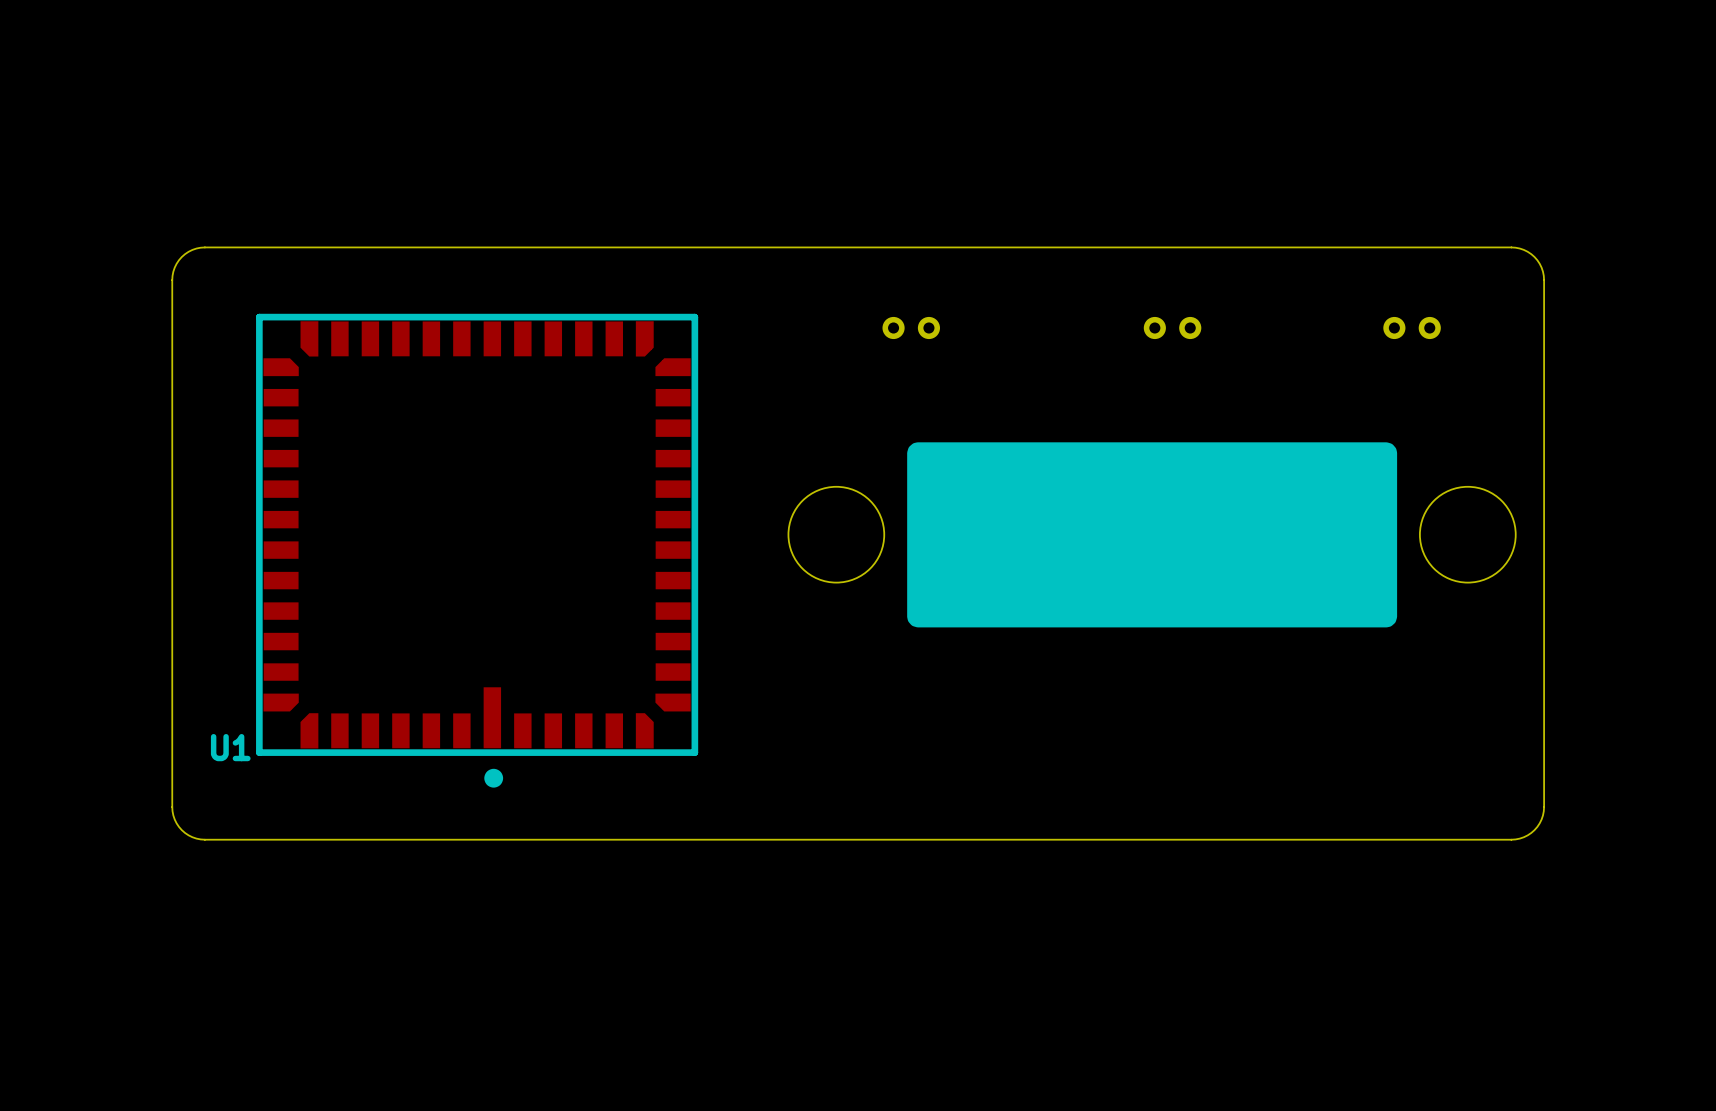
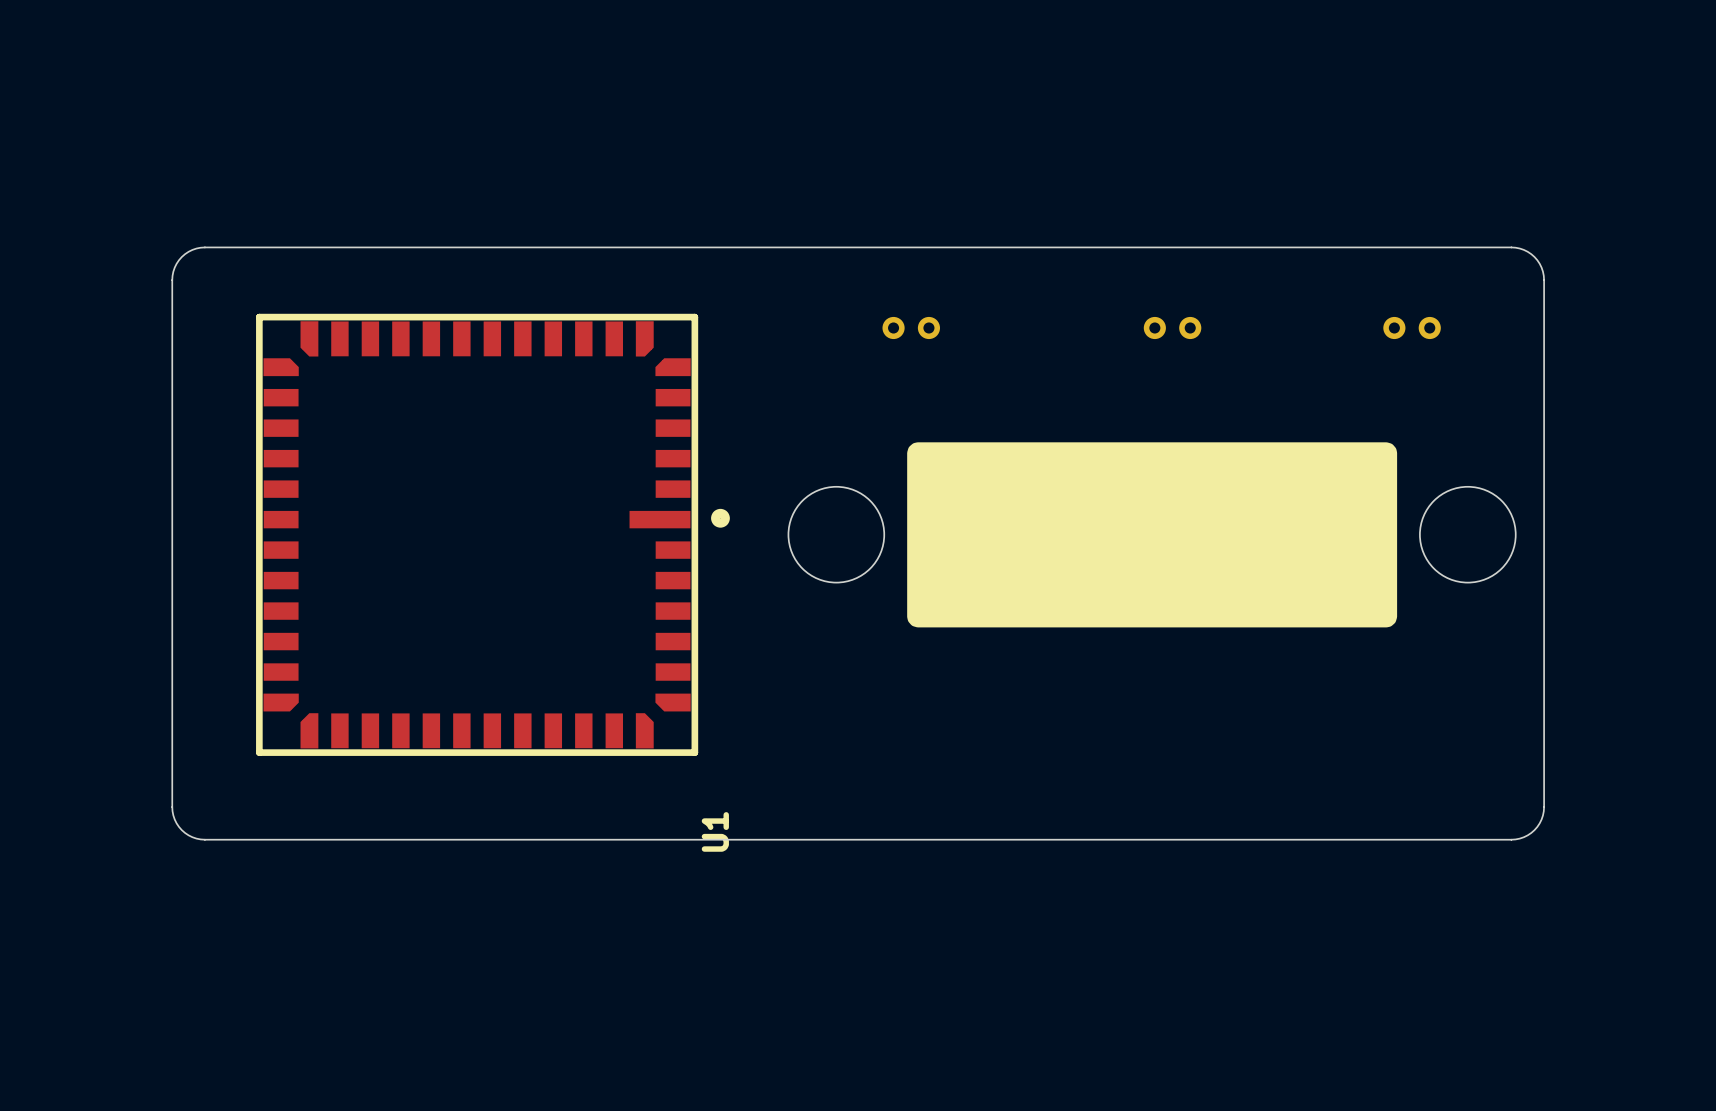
U1 rotation: 0° (477, 550) -> 90° counterclockwise (492, 534)

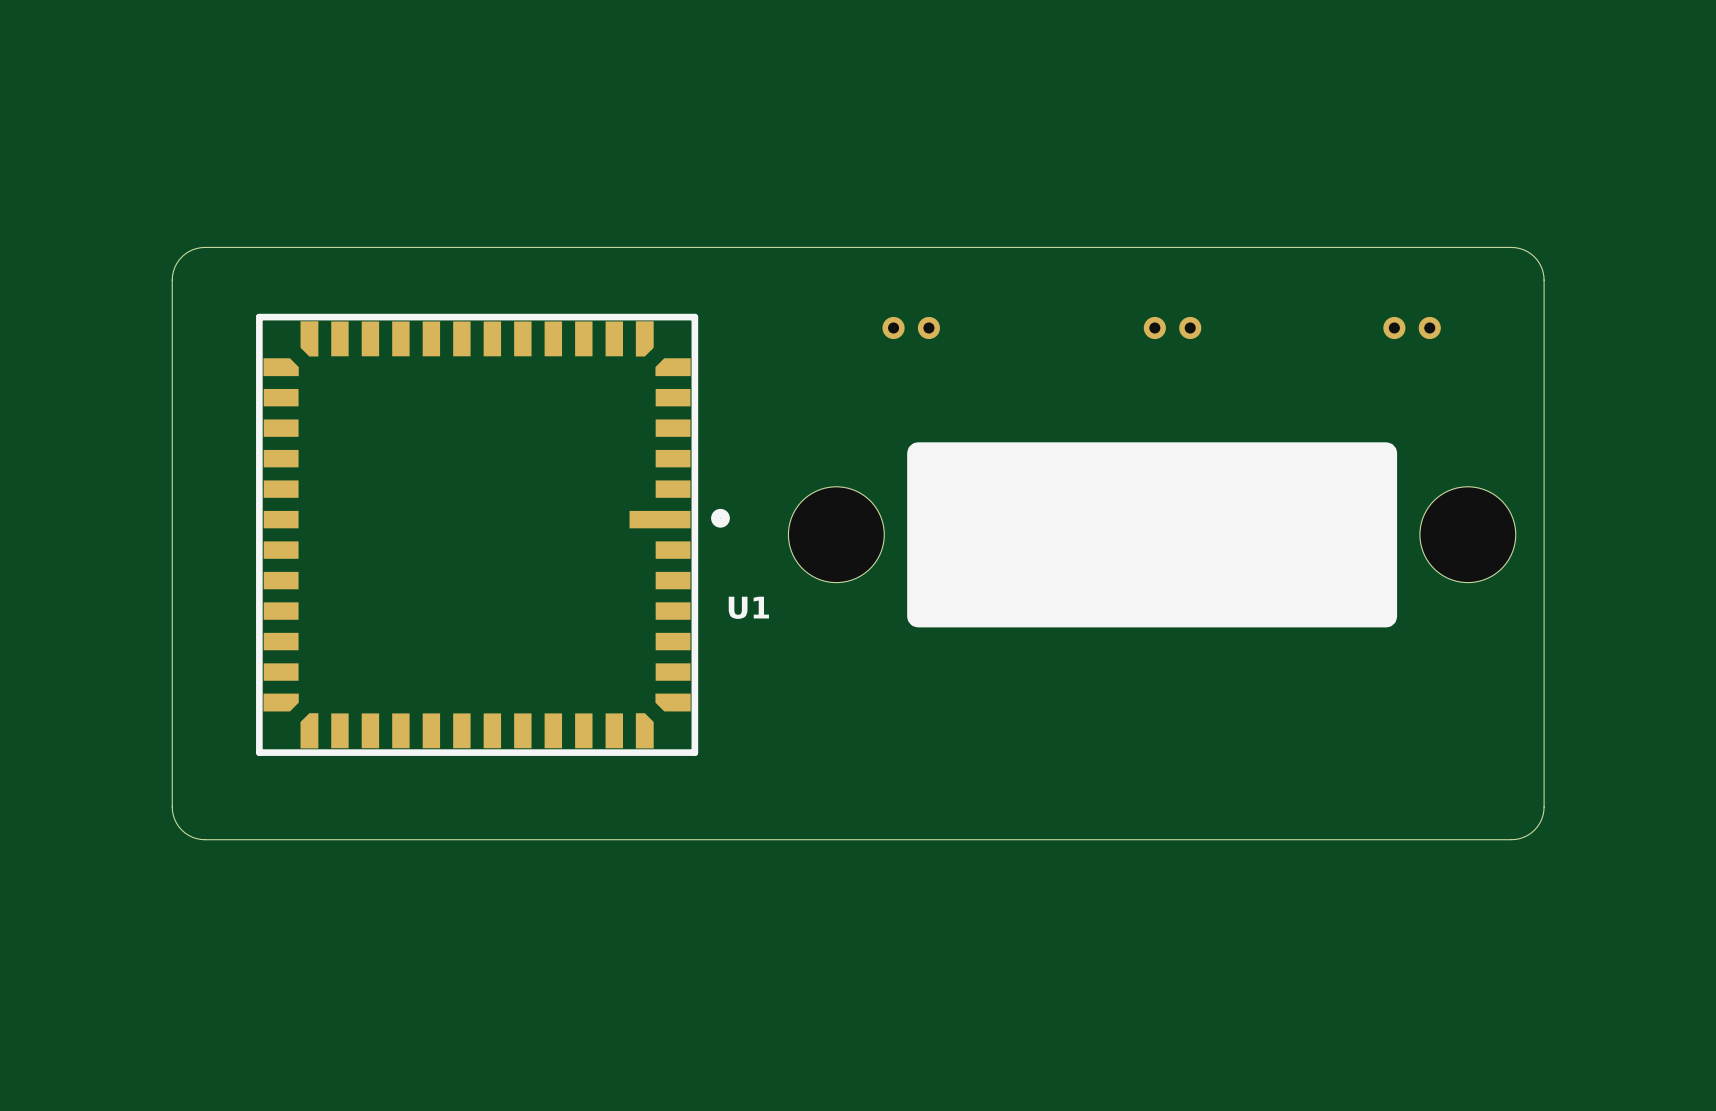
U1 name rotation: 0° (715, 831) -> 90° clockwise (748, 607)
U1 name position: U1 (715, 831) -> U1 (748, 607)

